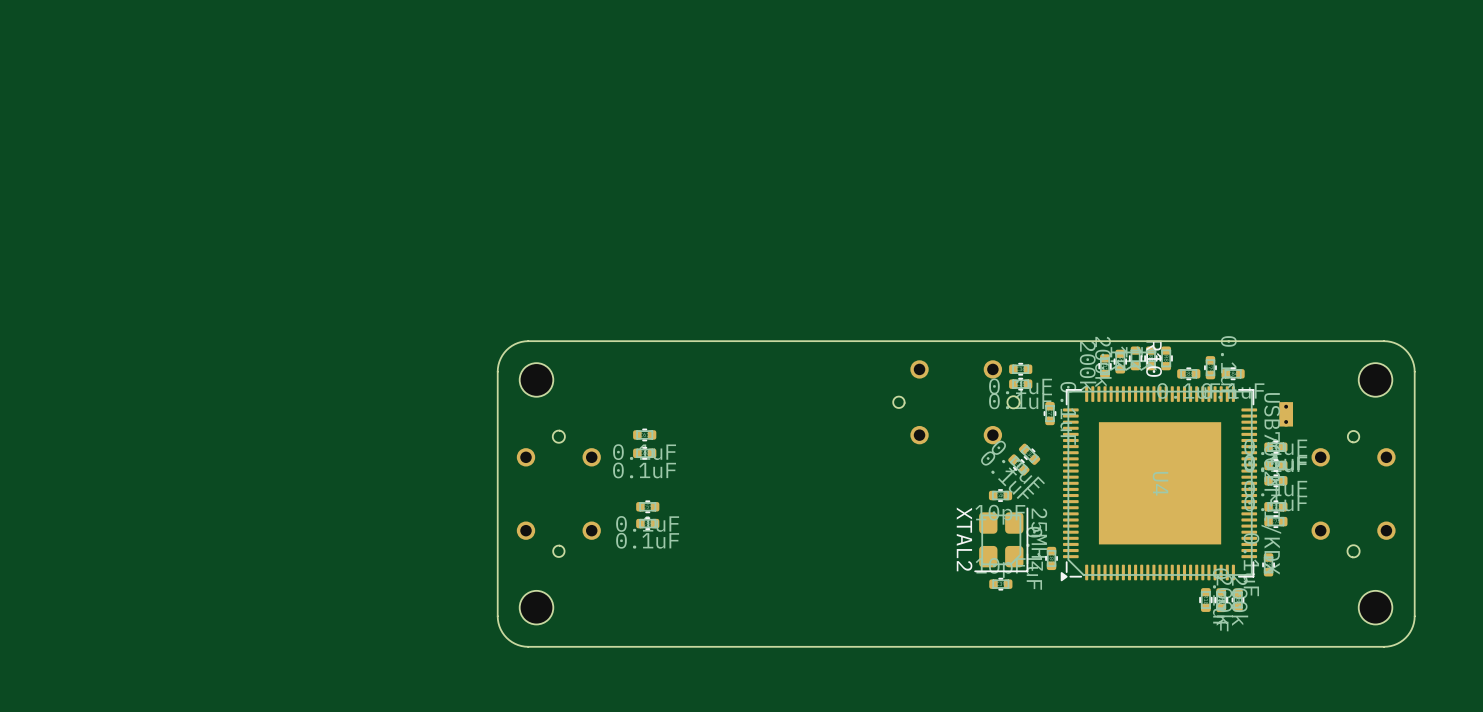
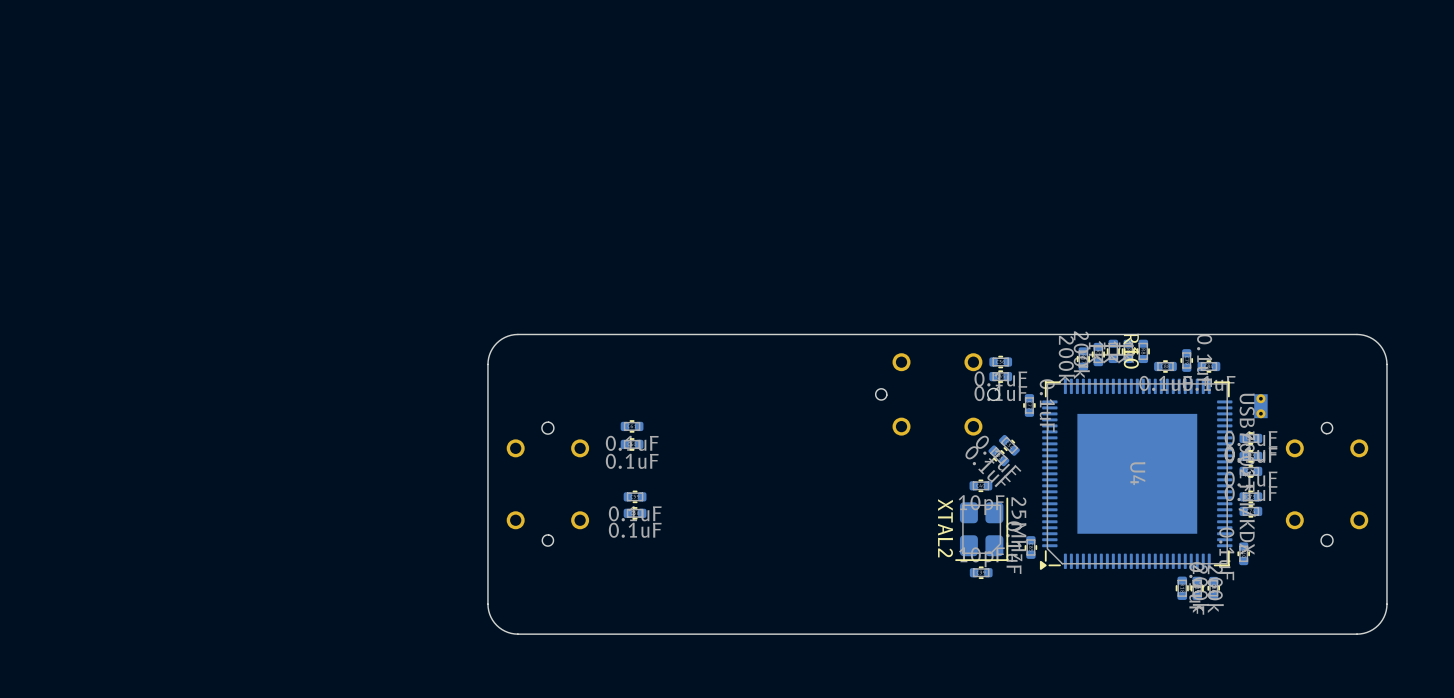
part: (536, 379) -> none
part: (1375, 379) -> none
part: (536, 607) -> none
part: (1375, 607) -> none

